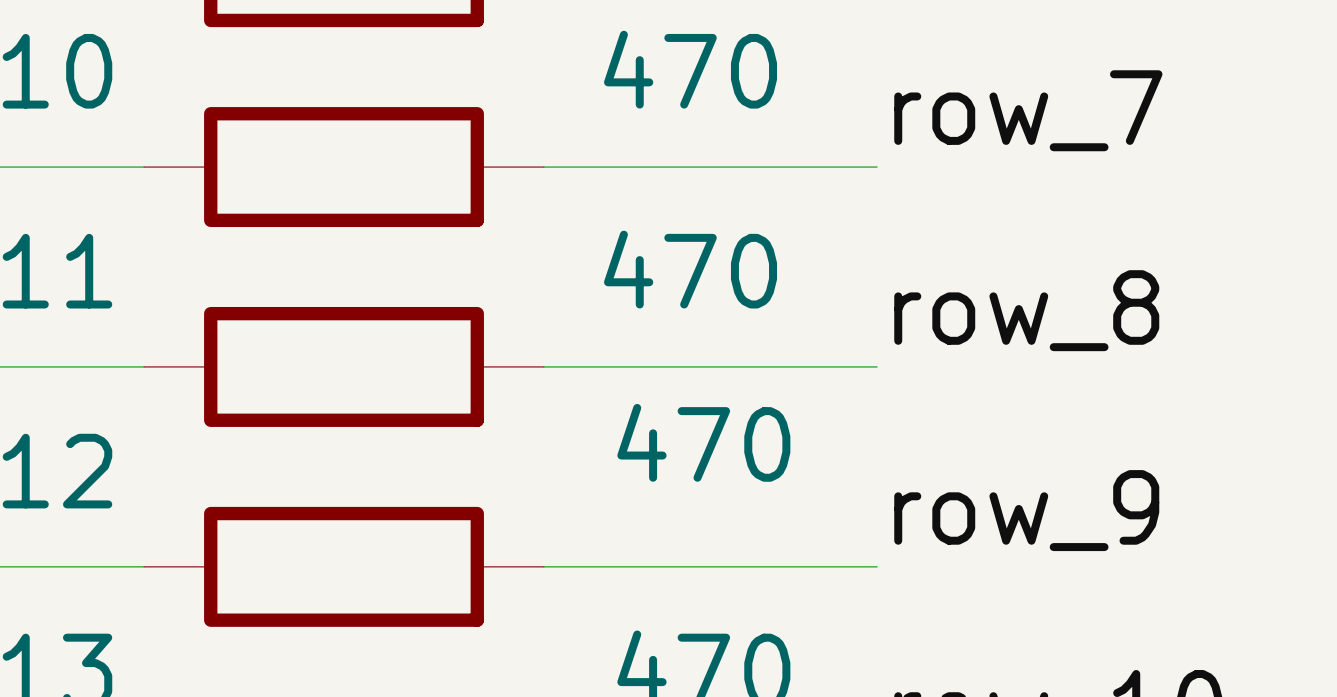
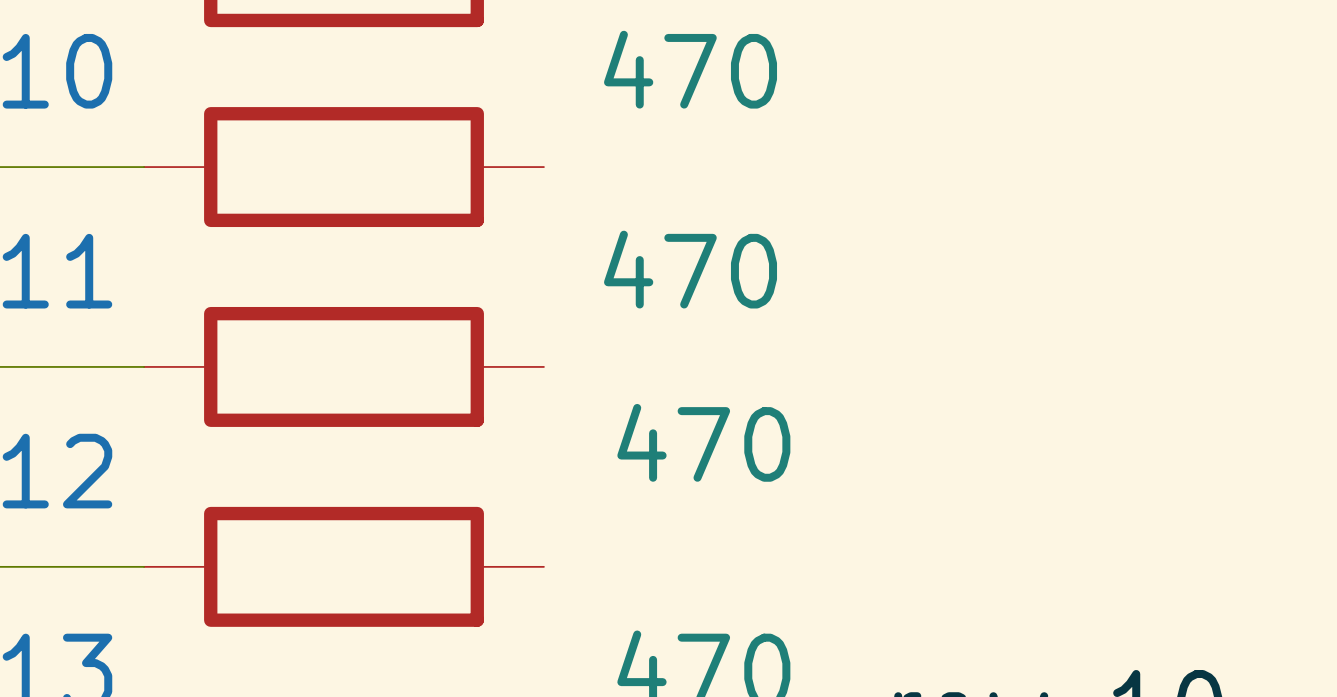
label: row_7 (1028, 110) -> none
wire: (543, 167) (877, 167) -> none
label: row_8 (1026, 310) -> none
wire: (543, 366) (877, 366) -> none
label: row_9 (1026, 510) -> none
wire: (543, 566) (877, 566) -> none

